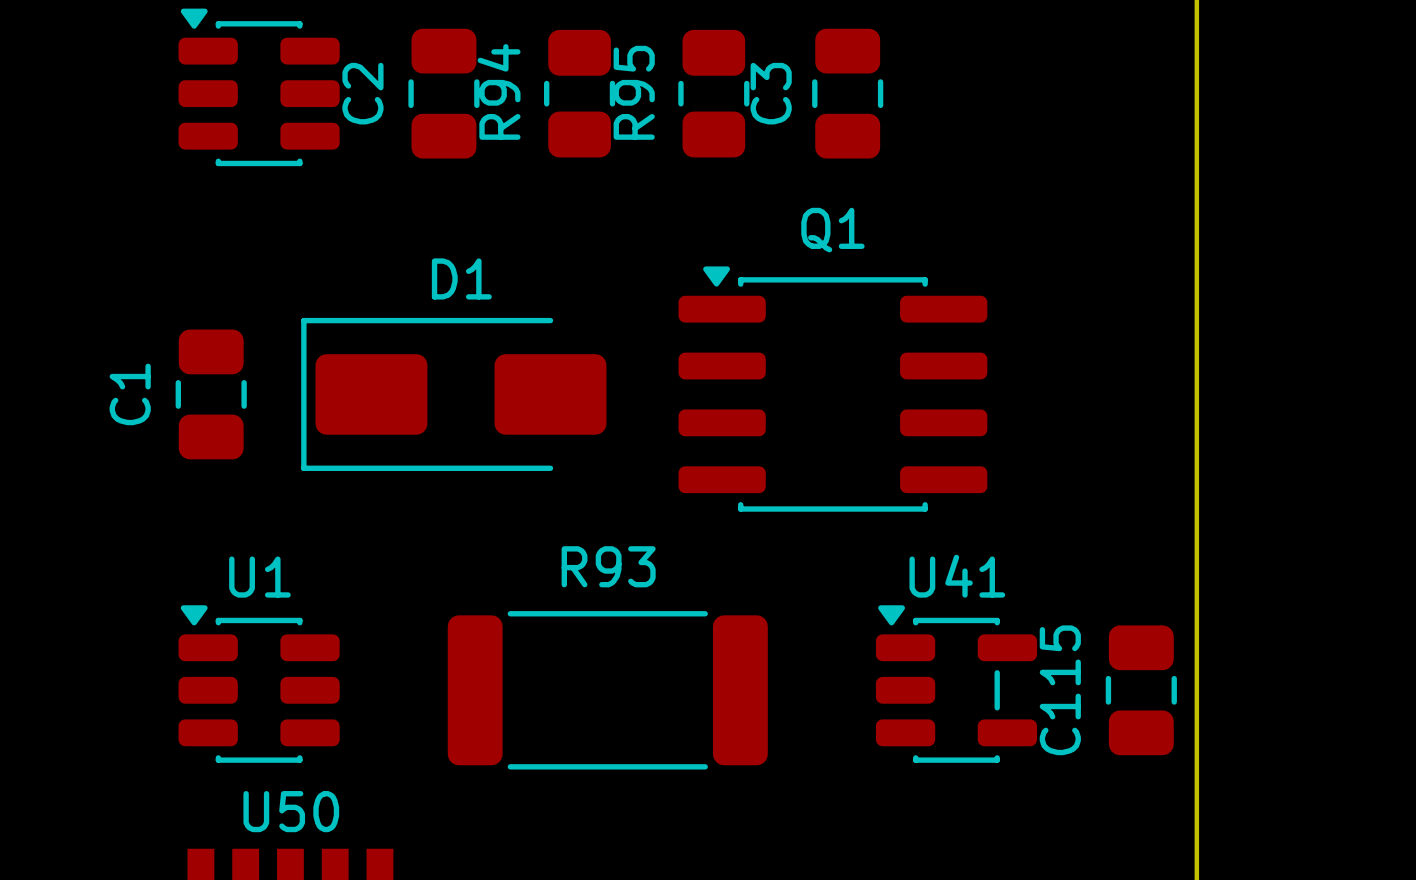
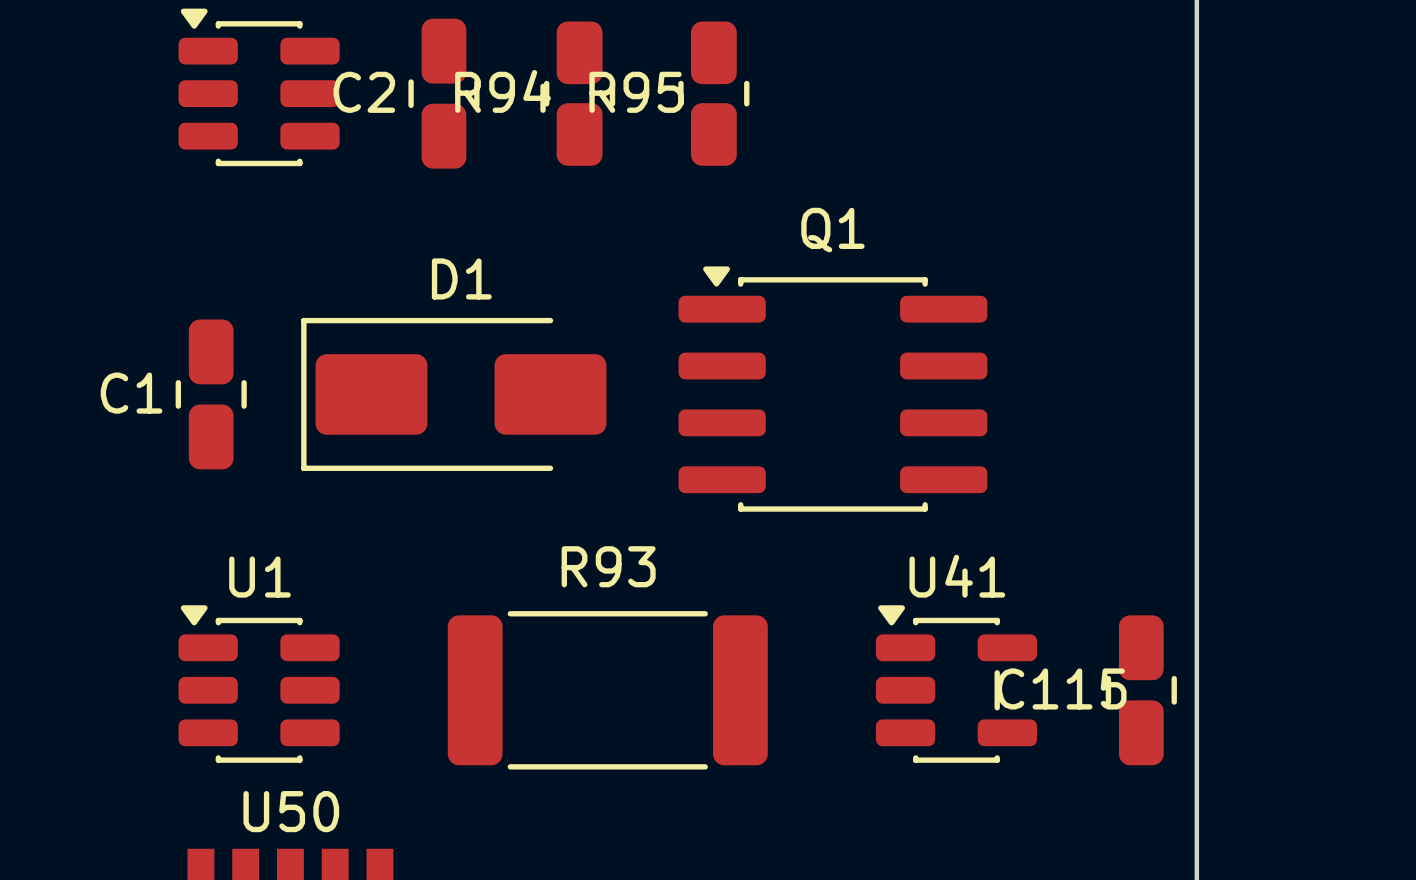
C2 footprint: [408, 28, 480, 159] -> [408, 18, 480, 169]
R94 footprint: [544, 29, 616, 158] -> [544, 21, 616, 166]
R95 footprint: [678, 29, 750, 158] -> [678, 21, 750, 166]
R94 name rotation: 0° (499, 91) -> 90° clockwise (502, 91)
R95 name rotation: 0° (634, 92) -> 90° clockwise (636, 92)
C2 name rotation: 0° (362, 93) -> 90° clockwise (364, 92)
C3: (847, 93) -> none
C1 footprint: [175, 329, 247, 460] -> [175, 319, 247, 470]
C1 name rotation: 0° (130, 394) -> 90° clockwise (131, 393)
C115 footprint: [1105, 625, 1177, 756] -> [1105, 615, 1177, 766]
C115 name rotation: 0° (1060, 690) -> 90° clockwise (1061, 688)

